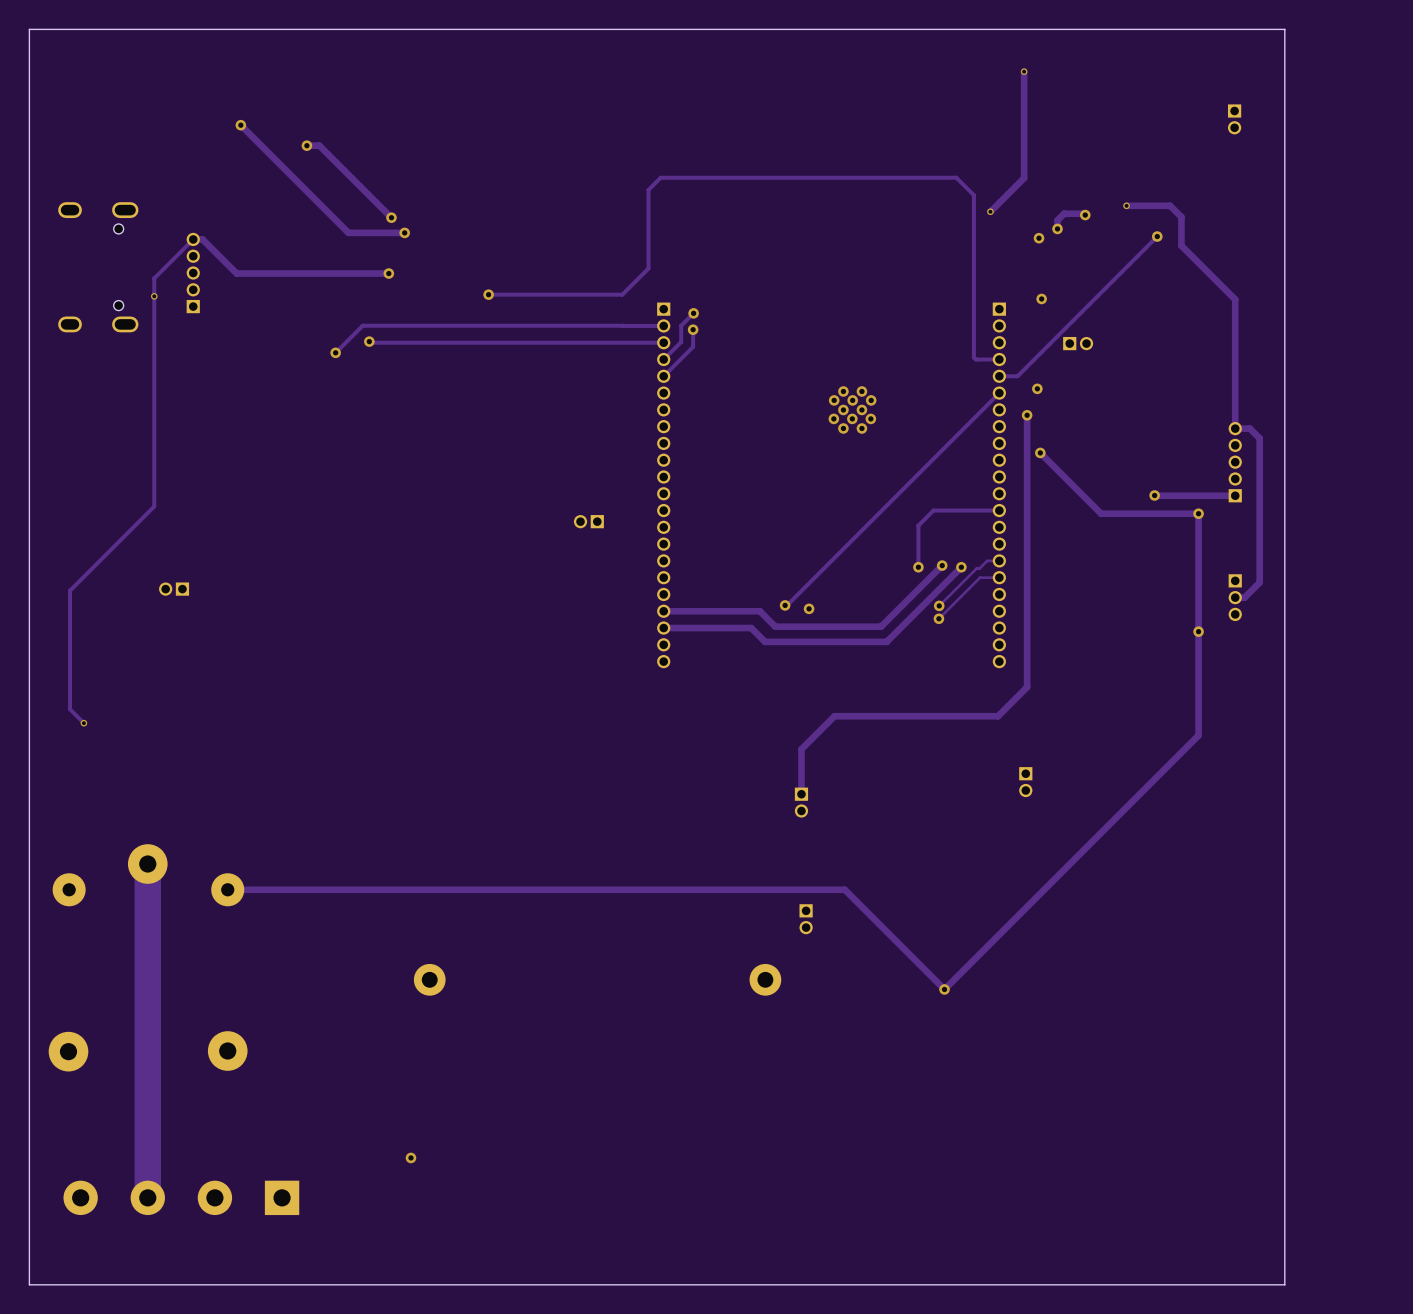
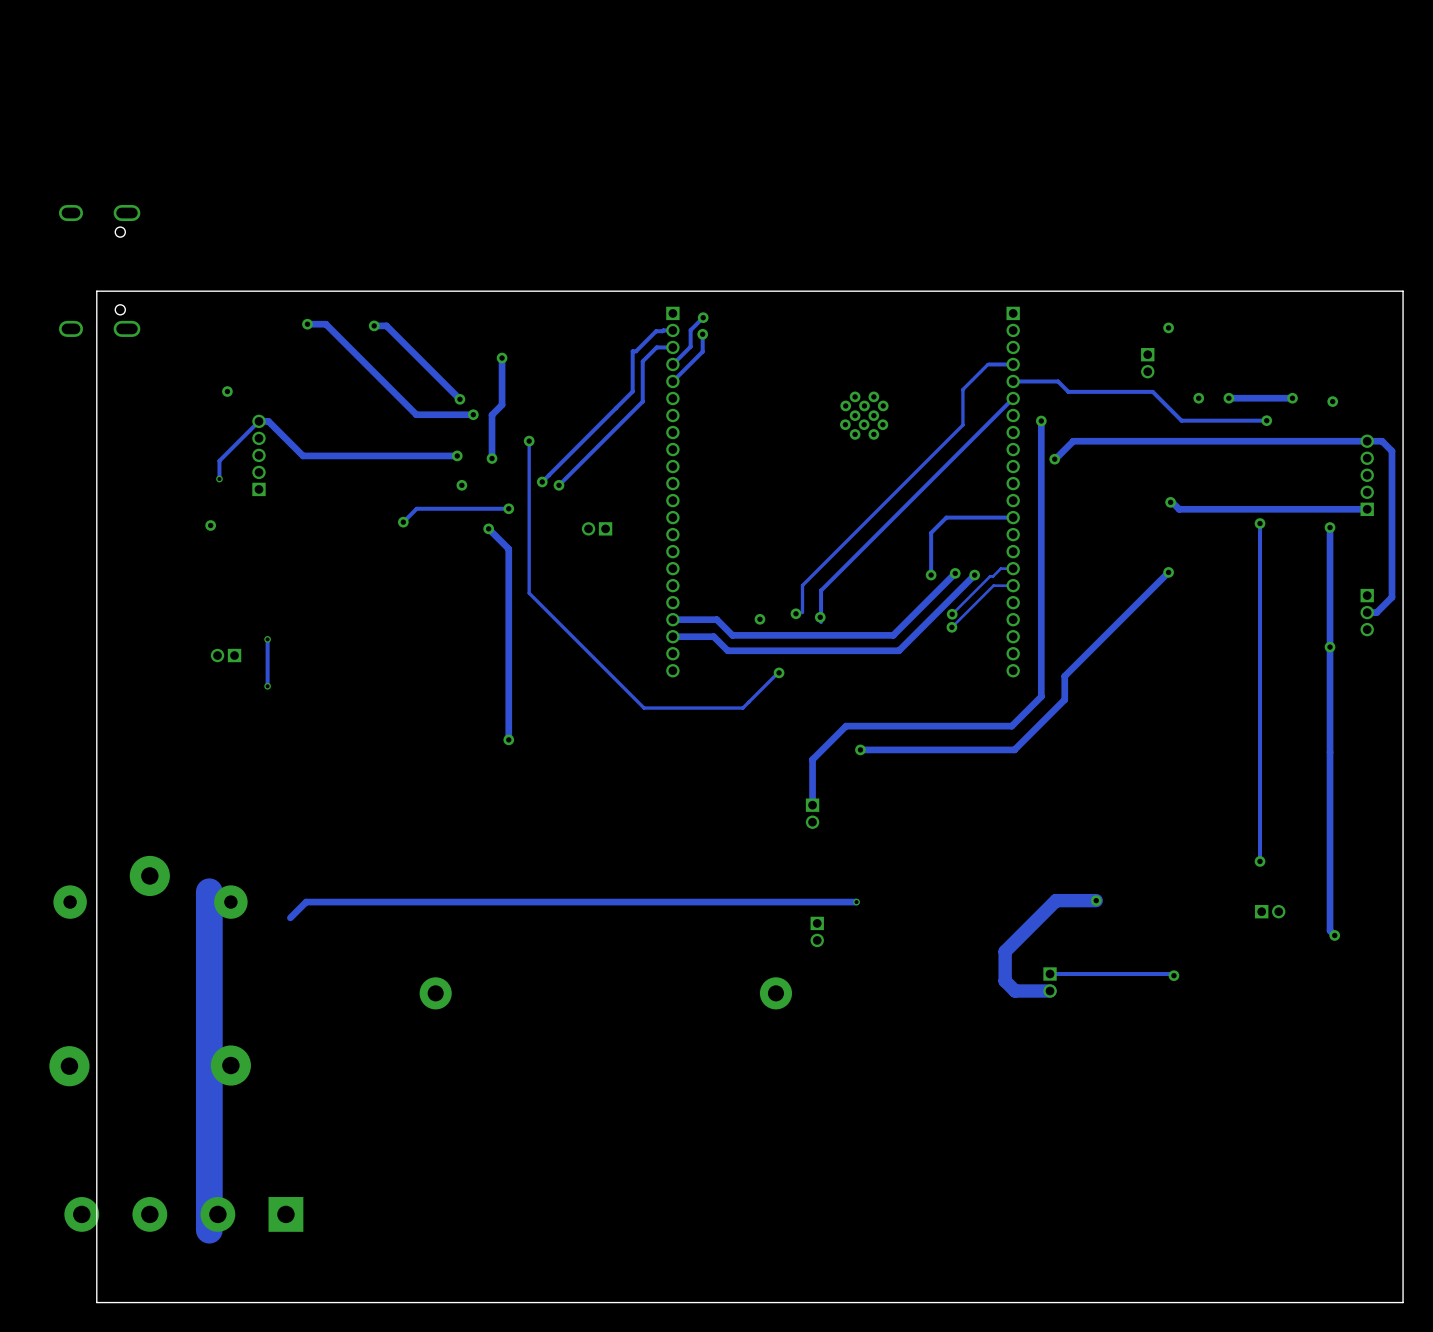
track: (1024, 71) (1024, 178) (990, 211) -> none
via: (1024, 71) -> none
part: (1234, 119) -> none
track: (240, 125) (348, 232) (404, 232) -> none
via: (240, 125) -> none
track: (306, 145) (319, 145) (391, 217) -> none
via: (306, 145) -> none
track: (1126, 205) (1170, 205) (1181, 217) (1181, 245) (1235, 299) (1235, 428) (1249, 428) (1259, 438) (1259, 582) (1244, 597) (1235, 597) -> none
via: (1126, 205) -> none
via: (990, 211) -> none
track: (1085, 215) (1064, 213) (1057, 220) (1057, 228) -> none
via: (1085, 215) -> none
via: (391, 217) -> none
via: (1057, 228) -> none
via: (404, 232) -> none
track: (1157, 236) (1017, 376) -> (1266, 420) (1181, 420) (1152, 391) (1068, 391) (1058, 381) (1031, 381)
via: (1157, 236) -> none
via: (1039, 238) -> none
part position: (193, 273) -> (258, 455)
track: (388, 273) (236, 273) (202, 239) (193, 239) (154, 278) (154, 506) (70, 590) (70, 709) (83, 723) -> none
via: (388, 273) -> none
track: (488, 294) (622, 294) (648, 268) (648, 189) (660, 177) (956, 177) (973, 195) (973, 357) (975, 359) -> (802, 612) (802, 585) (962, 425) (962, 389) (989, 364)
via: (488, 294) -> none
via: (154, 296) -> none
via: (1041, 298) -> none
track: none -> (307, 324) (325, 324) (416, 414) (473, 414)
via: none -> (307, 324)
track: none -> (374, 325) (386, 325) (459, 399)
via: none -> (1168, 327)
track: (654, 325) (362, 325) (335, 352) -> (663, 330) (656, 331) (636, 351) (632, 351) (632, 391) (542, 481)
track: (369, 341) (647, 342) -> (559, 485) (642, 401) (642, 361) (656, 347)
via position: (369, 341) -> (374, 325)
part rotation: 0° (1078, 343) -> 90° clockwise (1147, 363)
part position: (1078, 343) -> (1147, 363)
via: (335, 352) -> none
track: none -> (502, 358) (502, 404) (492, 414) (492, 458)
via: none -> (502, 358)
via: none -> (227, 391)
via: (1037, 388) -> none
via: none -> (1198, 398)
via: none -> (1228, 398)
track: none -> (1292, 398) (1228, 398)
via: none -> (1292, 398)
via: none -> (459, 399)
via: none -> (1332, 401)
via: none -> (473, 414)
via: none -> (1266, 420)
track: none -> (529, 441) (529, 593) (644, 708) (742, 708) (779, 672)
via: none -> (529, 441)
track: none -> (457, 455) (303, 455) (268, 421) (258, 421) (219, 460) (219, 479)
via: none -> (457, 455)
via: none -> (492, 458)
track: (1040, 452) (1101, 513) (1198, 513) (1198, 735) (944, 989) (844, 889) -> none
track: none -> (1056, 458) (1073, 441) (1382, 441) (1391, 451) (1391, 597) (1376, 612) (1367, 612)
part position: (1235, 462) -> (1367, 475)
via: none -> (219, 479)
via: none -> (542, 481)
via: none -> (461, 485)
via: none -> (559, 485)
track: (1154, 495) (1235, 495) -> none
track: none -> (1171, 502) (1179, 509) (1367, 509)
track: none -> (508, 508) (416, 508) (403, 522)
via: none -> (508, 508)
via: (1198, 513) -> none
via: none -> (403, 522)
track: none -> (1260, 523) (1260, 861)
via: none -> (1260, 523)
via: none -> (210, 525)
track: none -> (1330, 527) (1330, 930) (1334, 935)
via: none -> (1330, 527)
track: none -> (488, 528) (508, 548) (508, 739)
via: none -> (488, 528)
track: none -> (1168, 572) (1064, 676) (1064, 699) (1014, 749) (860, 749)
via: none -> (1168, 572)
track: (809, 582) (785, 605) -> (821, 590) (821, 622)
part position: (174, 589) -> (226, 655)
part position: (1235, 597) -> (1367, 612)
via: none -> (759, 619)
track: (707, 611) (759, 611) (775, 626) -> (716, 619) (732, 635) (786, 635)
track: (704, 628) (751, 628) (765, 641) -> (713, 636) (727, 650) (775, 650)
track: none -> (267, 639) (267, 686)
via: none -> (267, 639)
via: (1198, 631) -> none
via: none -> (1330, 647)
via: none -> (779, 672)
via: none -> (267, 686)
via: (83, 723) -> none
via: none -> (508, 739)
via: none -> (860, 749)
part: (1025, 782) -> none
via: none -> (1260, 861)
track: (147, 864) (147, 1197) -> (209, 891) (209, 1230)
track: none -> (1096, 900) (1056, 900) (1005, 951) (1005, 981) (1015, 991) (1050, 991)
via: none -> (1096, 900)
track: (302, 889) (227, 889) -> (306, 902) (290, 917)
via: none -> (856, 902)
part: none -> (1270, 911)
via: none -> (1334, 935)
track: none -> (1050, 973) (1172, 973) (1173, 975)
via: none -> (1173, 975)
part: none -> (1050, 982)
via: (944, 989) -> none
via: (410, 1157) -> none
board edge: (1284, 1284) (1284, 29) (29, 29) (29, 1284) (95, 1284) -> (1302, 1302) (1403, 1302) (1403, 291) (96, 291) (96, 1302)

